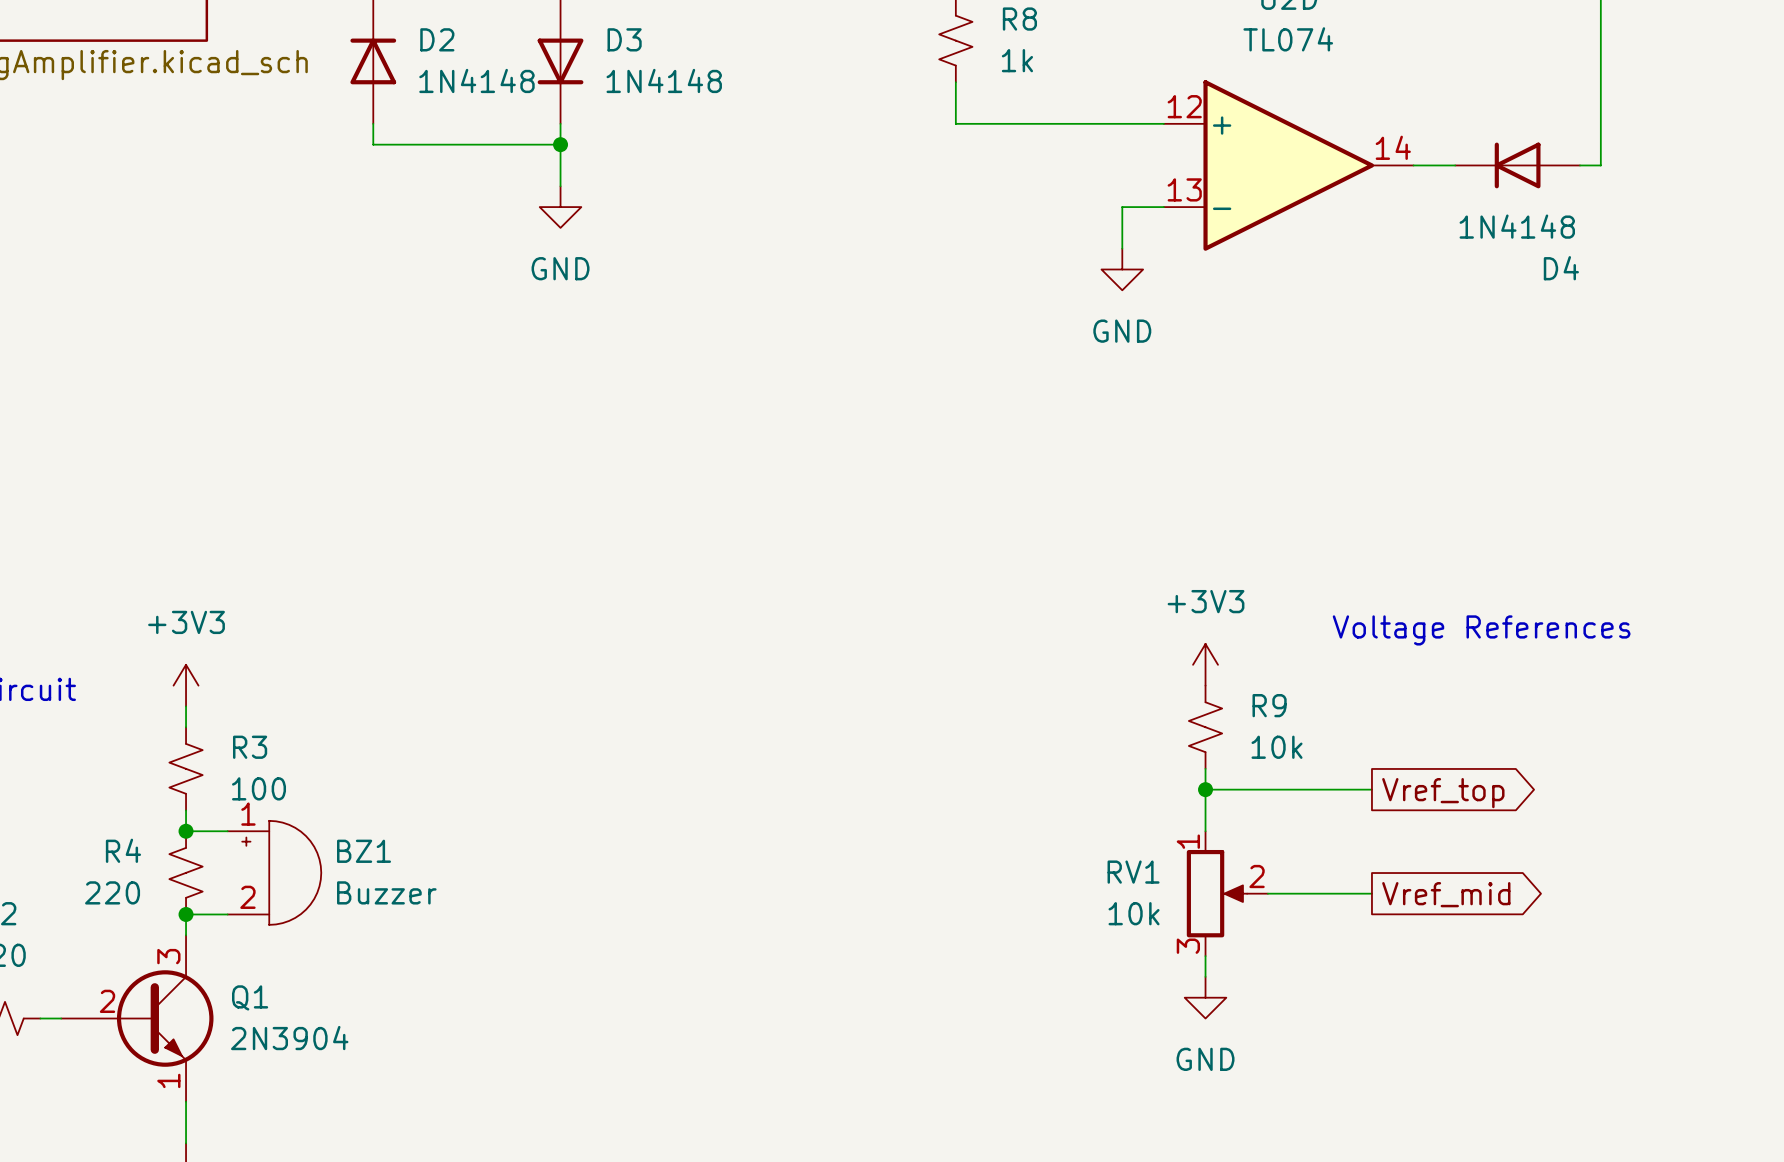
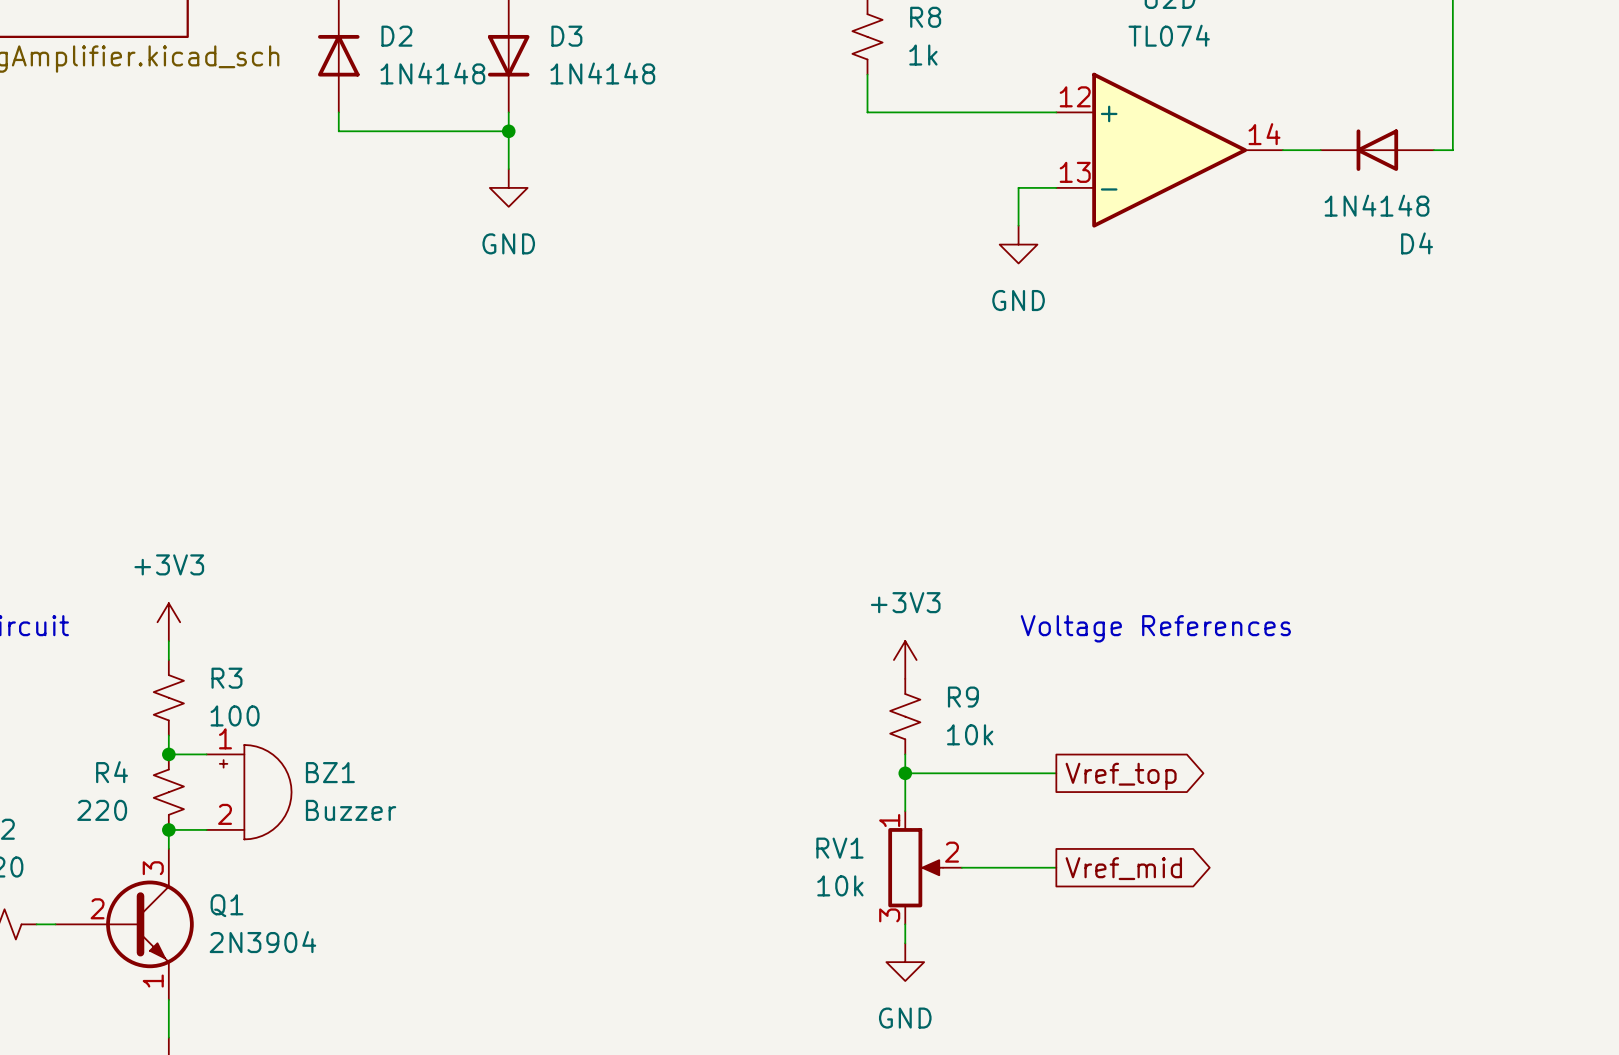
text position: Voltage References (1481, 630) -> Voltage References (1155, 628)
power symbol position: +3V3 (1205, 664) -> +3V3 (905, 660)
R9 position: (1205, 727) -> (905, 716)
wire: (1205, 768) (1205, 831) -> (905, 754) (905, 811)
wire: (1205, 789) (1371, 789) -> (905, 773) (1056, 773)
junction: (1205, 789) -> none
global label position: Vref_top (1443, 793) -> Vref_top (1121, 776)
junction: none -> (905, 773)
RV1 position: (1227, 893) -> (925, 867)
wire: (1267, 893) (1371, 893) -> (961, 867) (1056, 867)
global label position: Vref_mid (1446, 894) -> Vref_mid (1123, 868)
wire: (1205, 956) (1205, 976) -> (905, 924) (905, 943)
power symbol position: GND (1205, 997) -> GND (905, 962)

